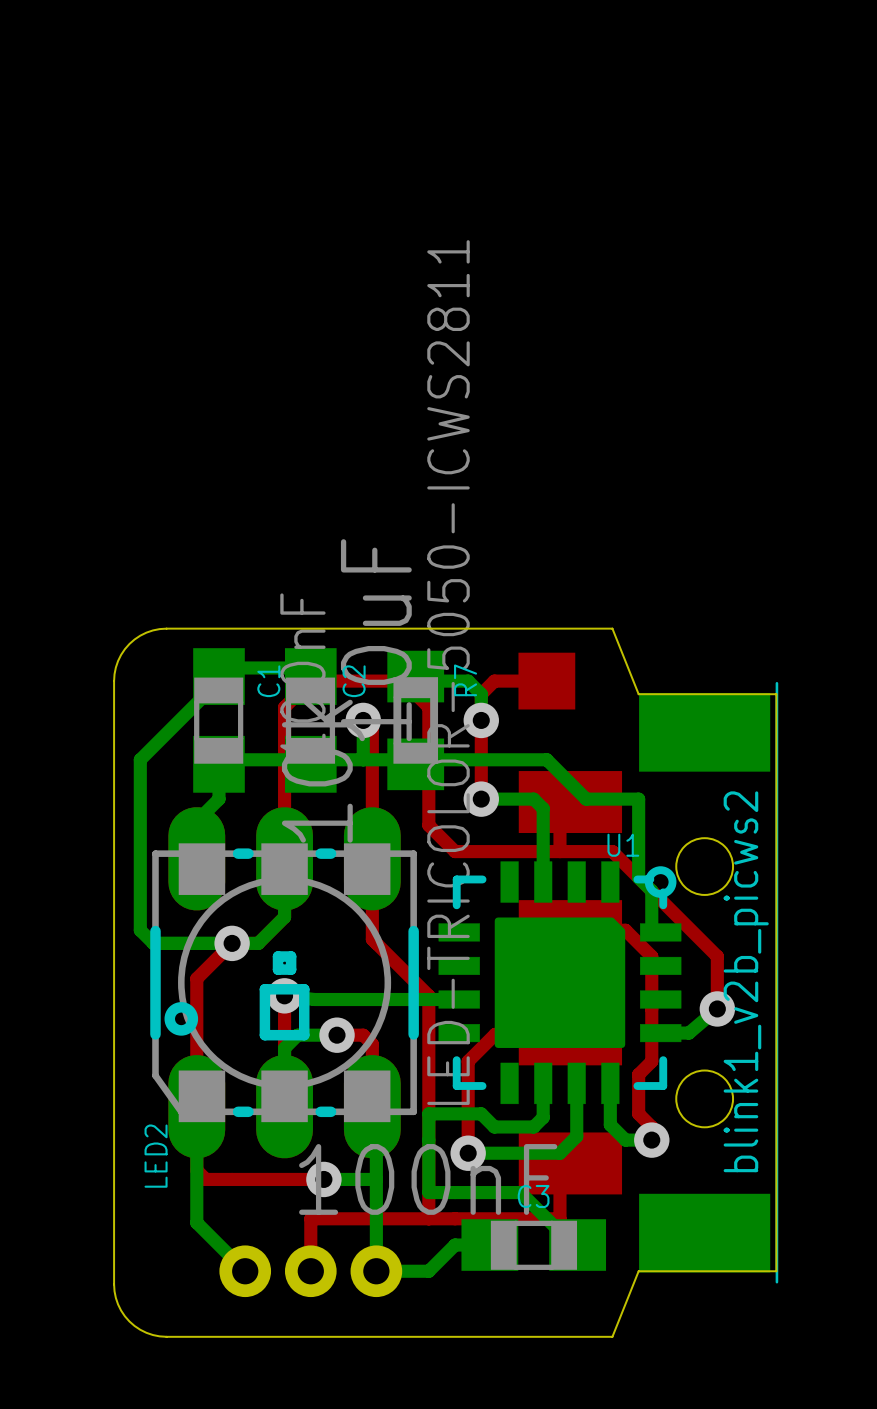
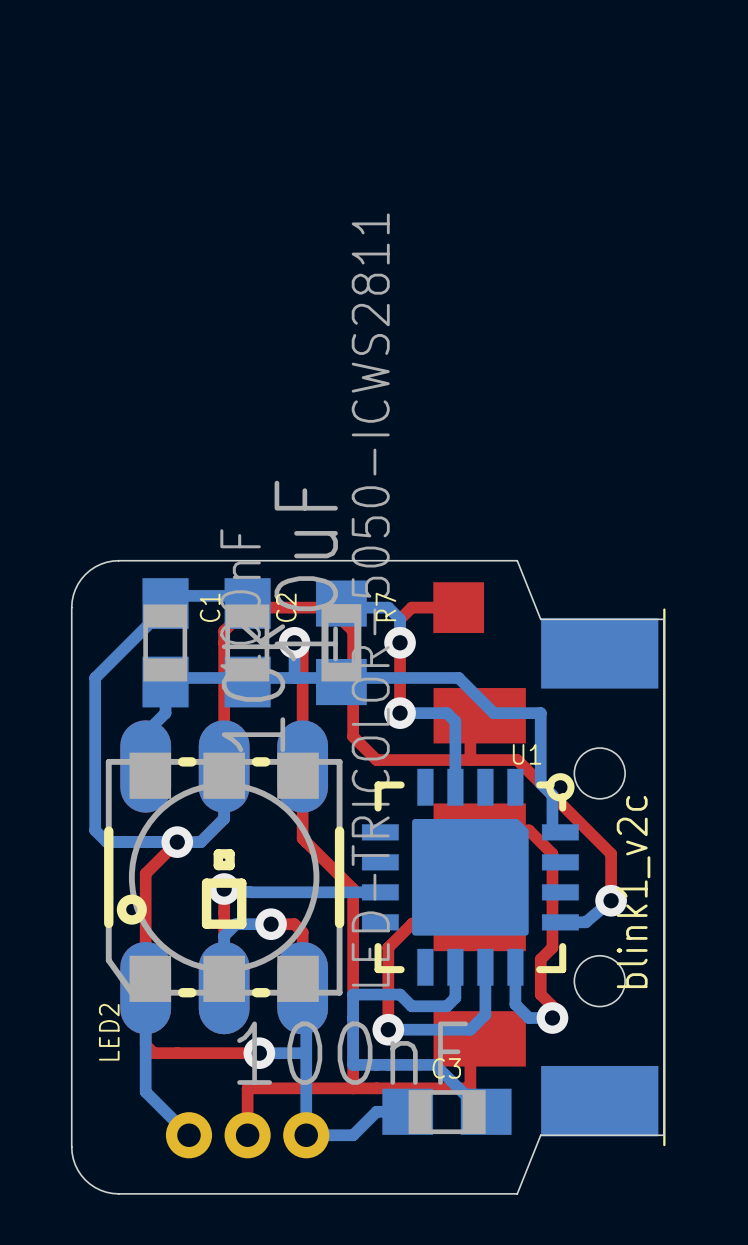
text: blink1_v2b_picws2 (746, 981) -> blink1_v2c (633, 891)

